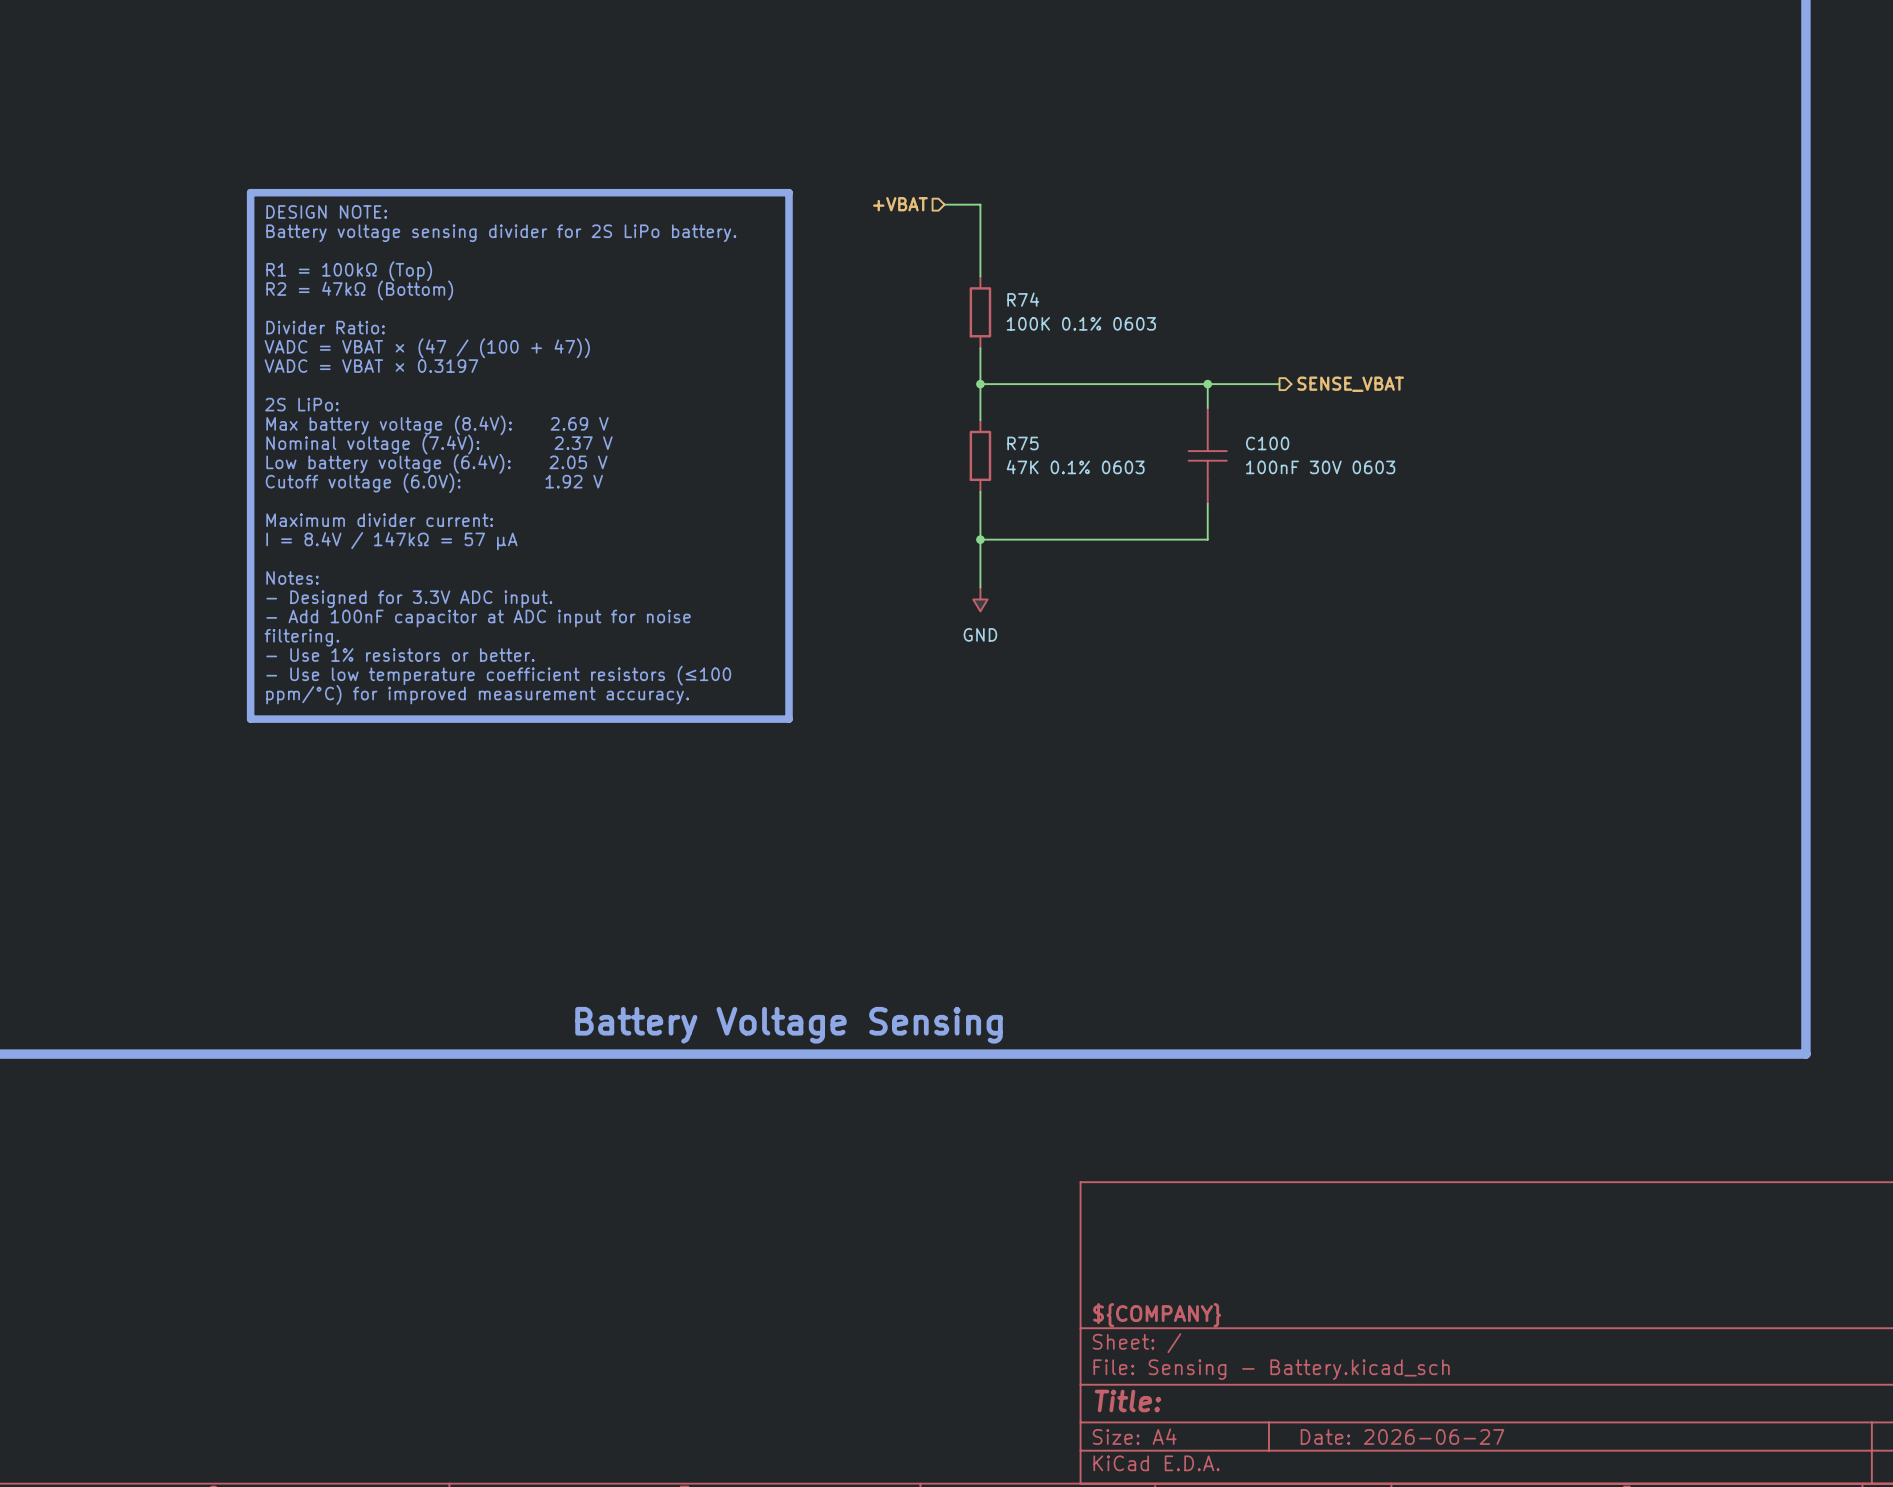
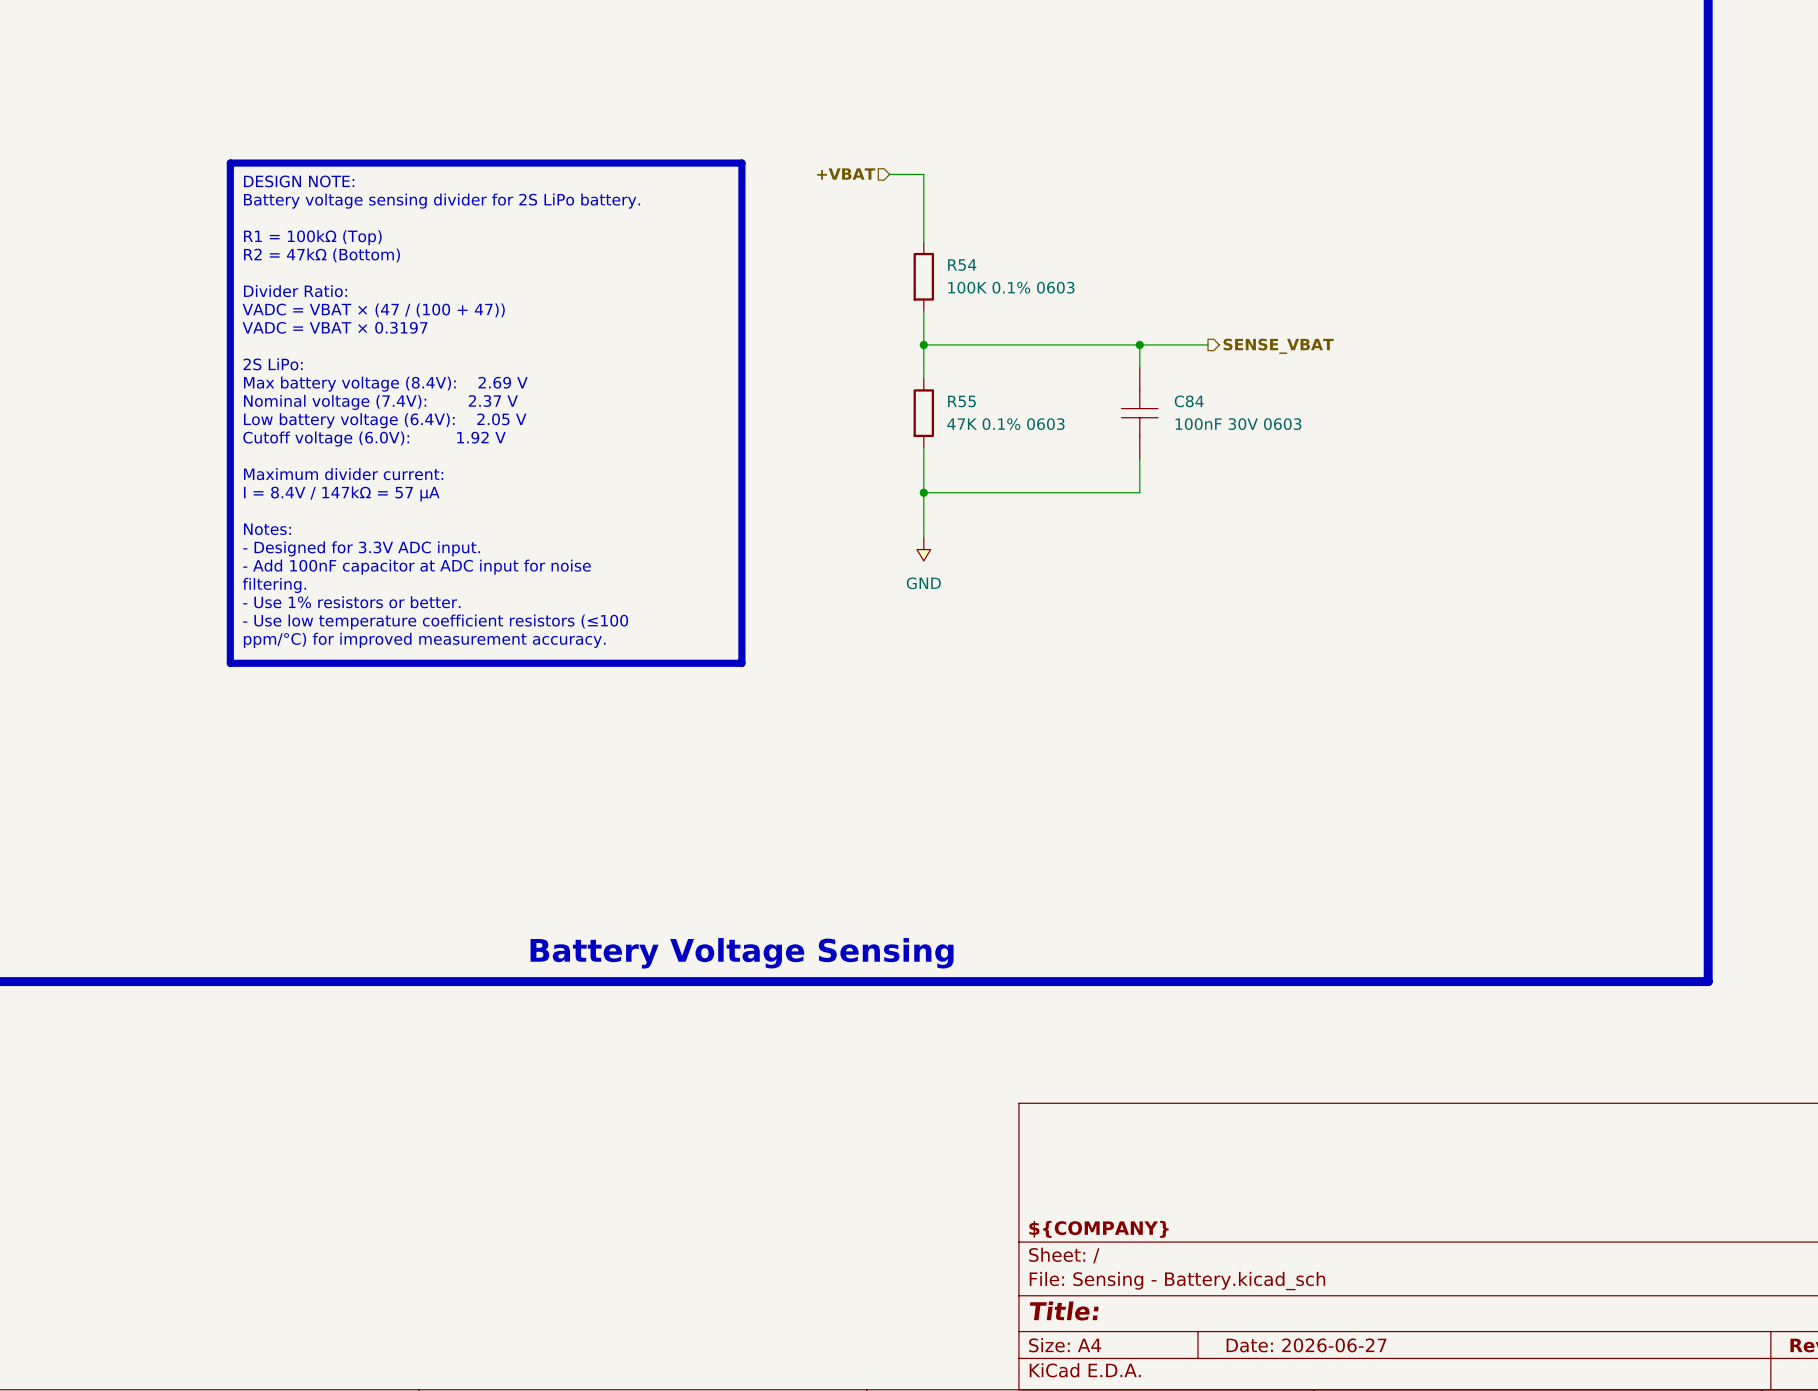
R74 name: R74 (1023, 299) -> R54 (962, 265)
R75 name: R75 (1022, 443) -> R55 (961, 401)
C100 name: C100 (1267, 443) -> C84 (1189, 401)

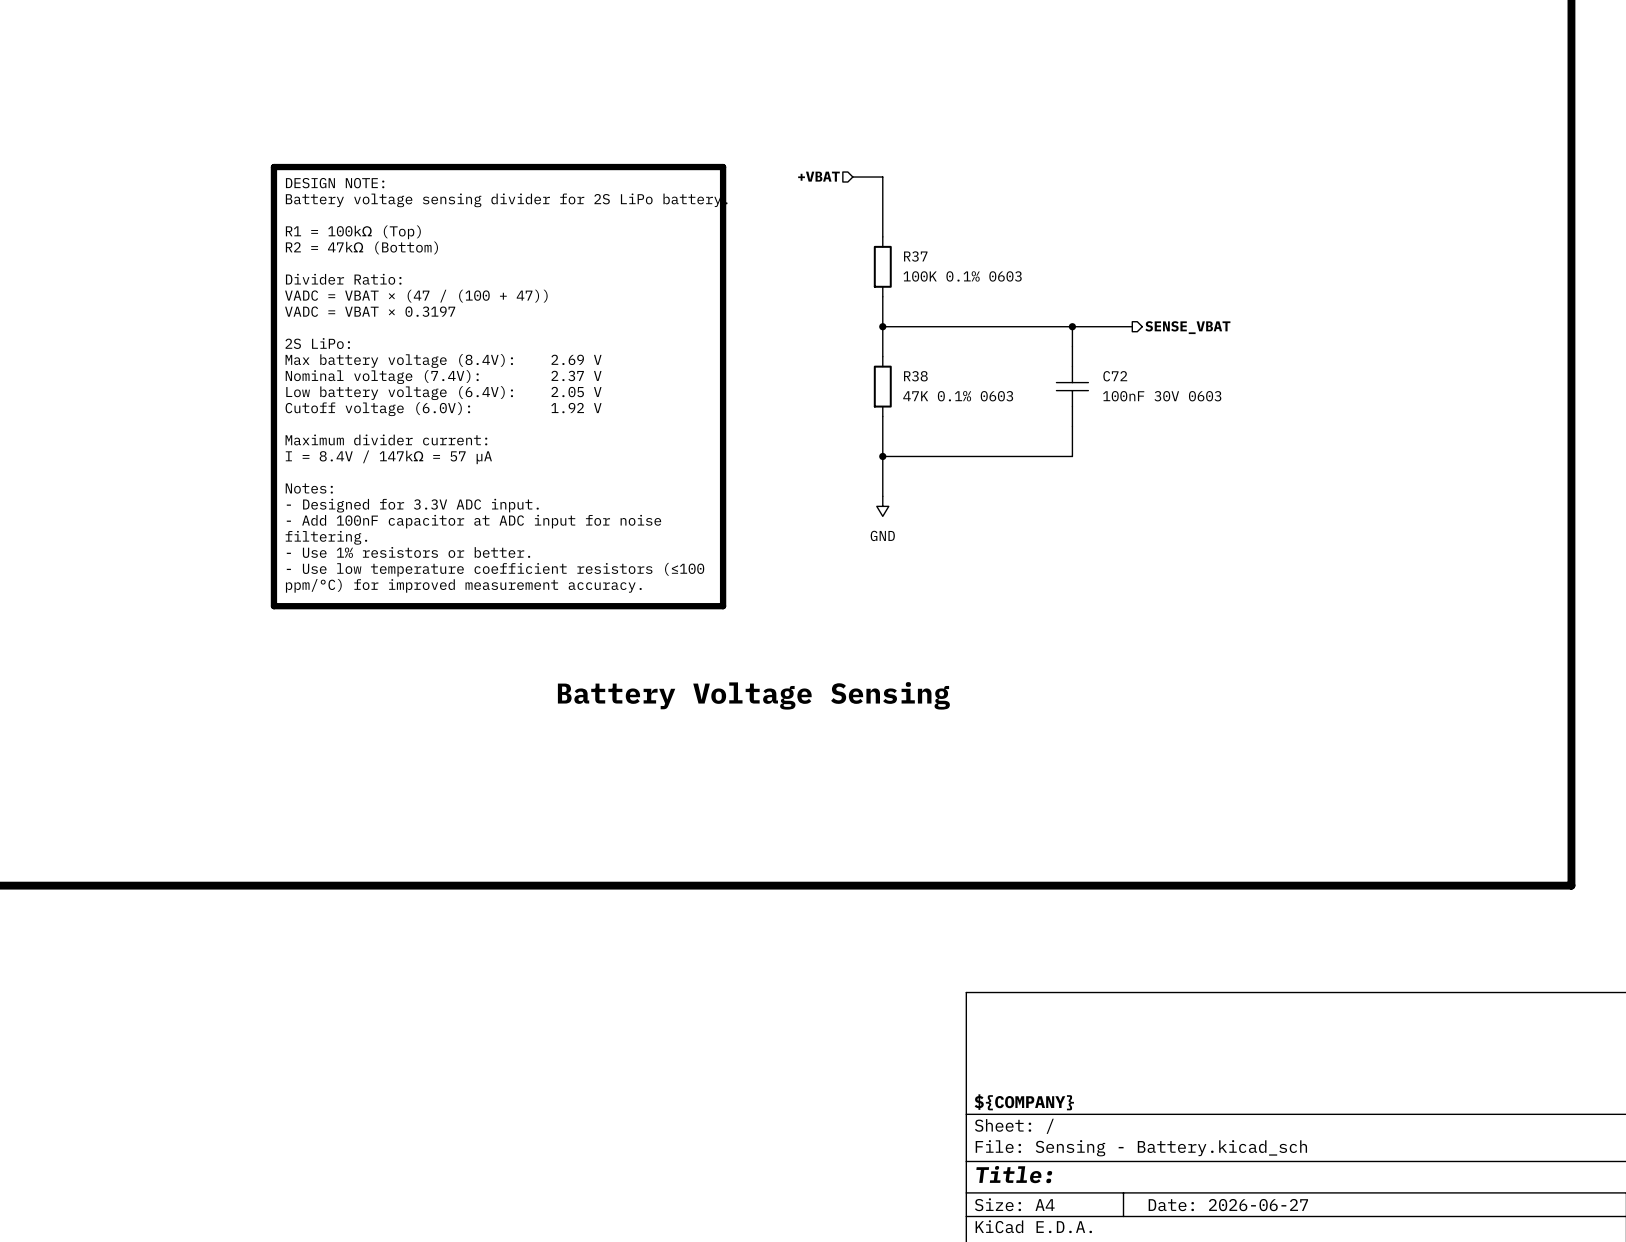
R54 name: R54 (962, 265) -> R37 (915, 256)
R55 name: R55 (961, 401) -> R38 (915, 376)
C84 name: C84 (1189, 401) -> C72 (1115, 376)
text position: Battery Voltage Sensing (742, 953) -> Battery Voltage Sensing (753, 695)

